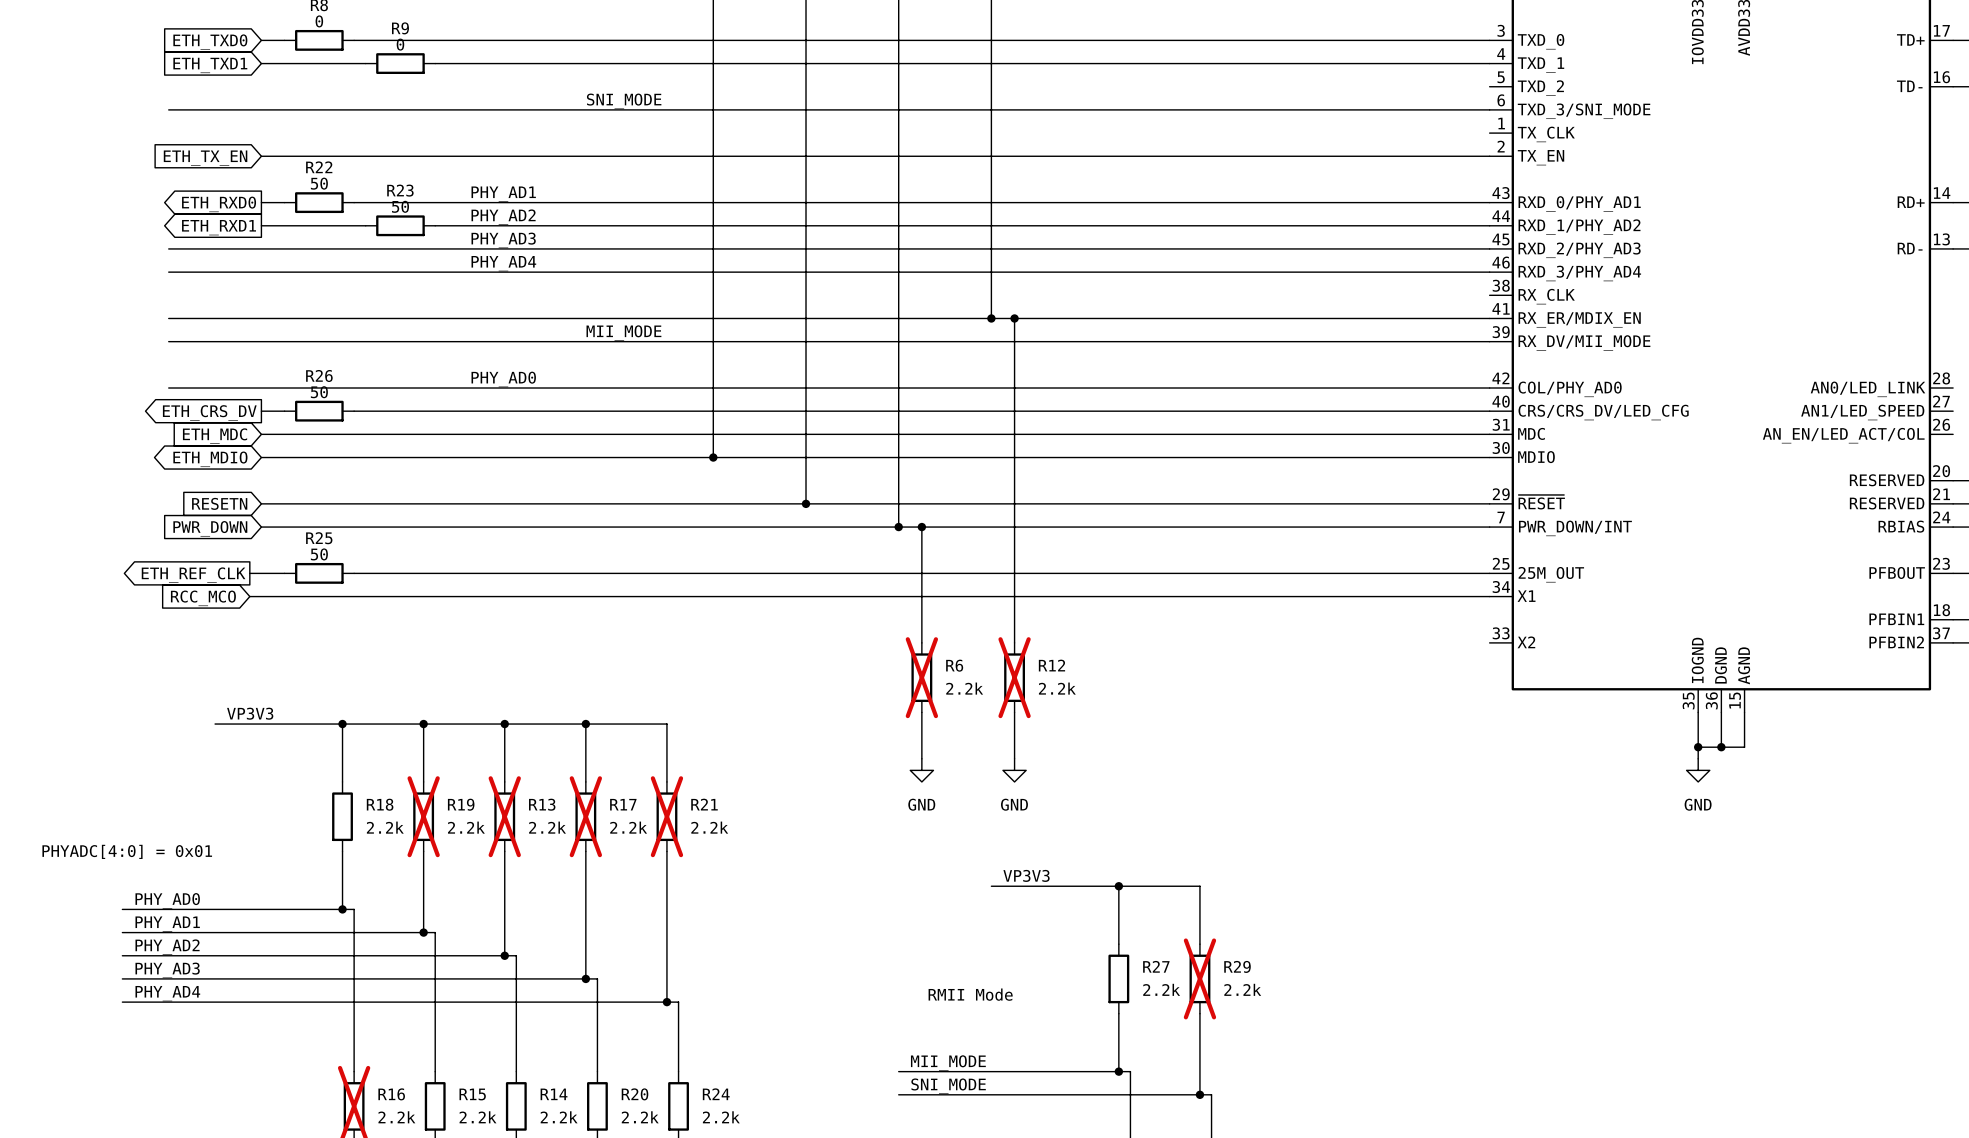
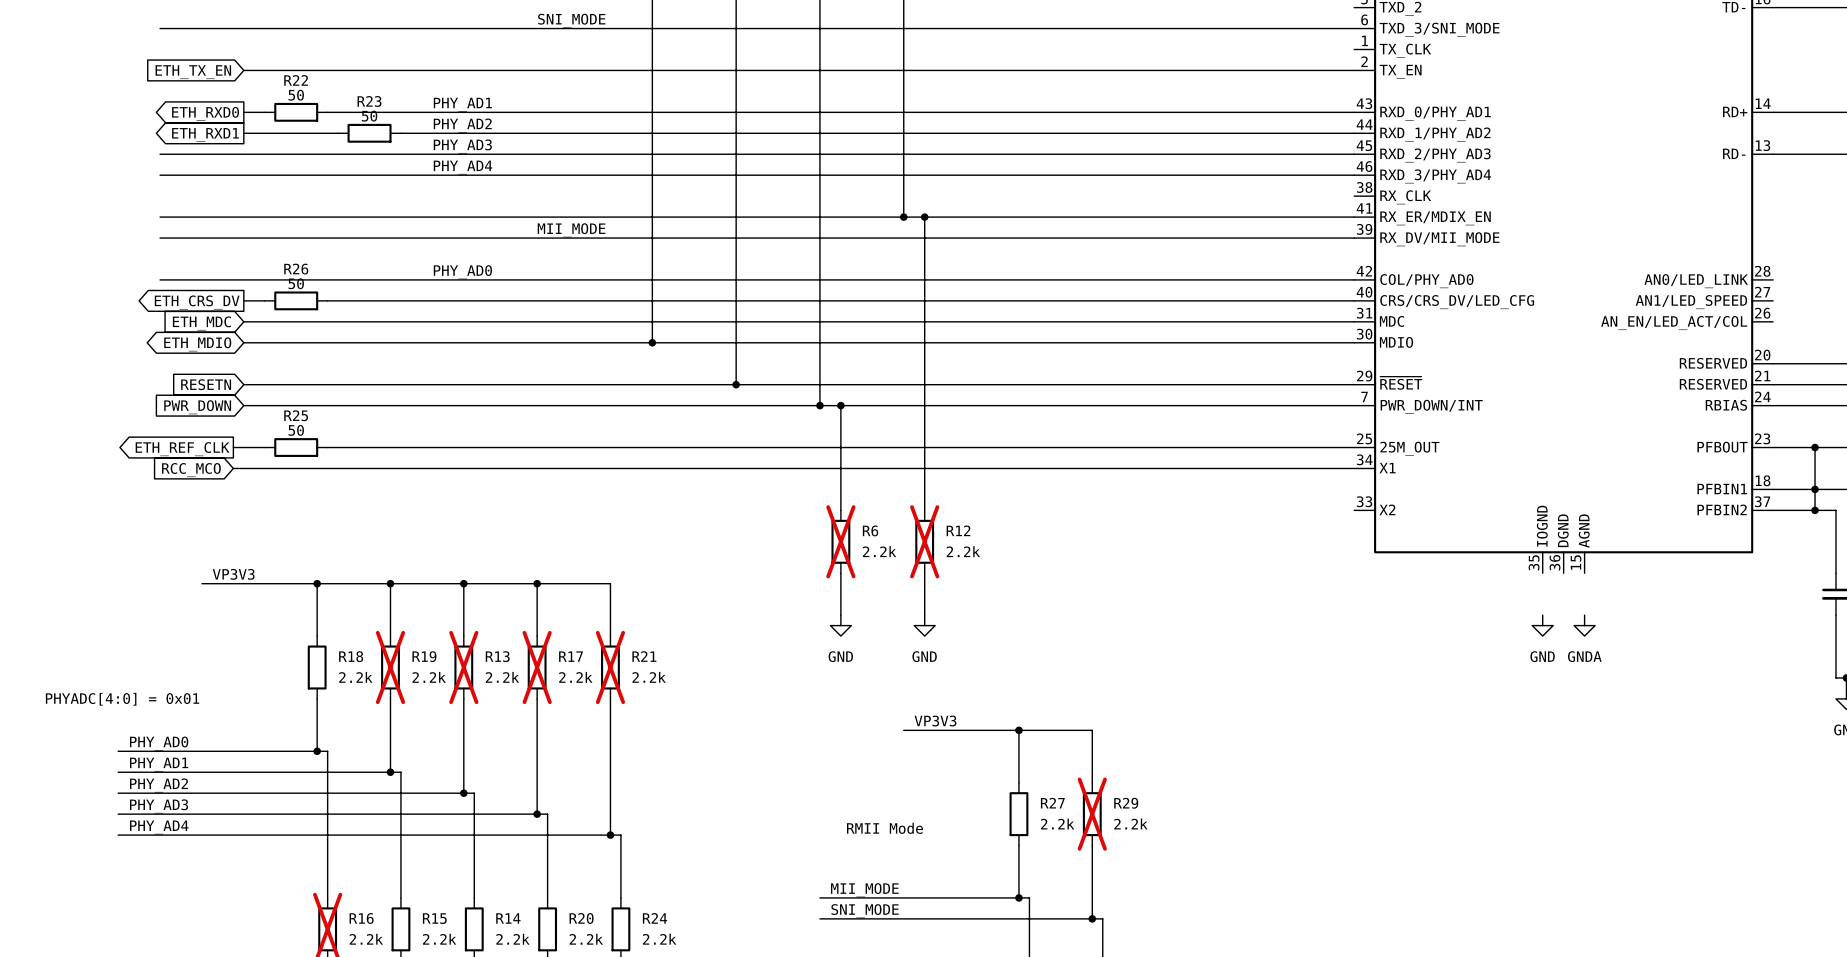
wire: (1698, 712) (1698, 758) -> none
wire: (1721, 712) (1721, 747) -> none
wire: (1744, 712) (1744, 747) (1698, 747) -> none
junction: (1698, 747) -> none
junction: (1721, 747) -> none
power symbol: none -> GNDA (1584, 625)

